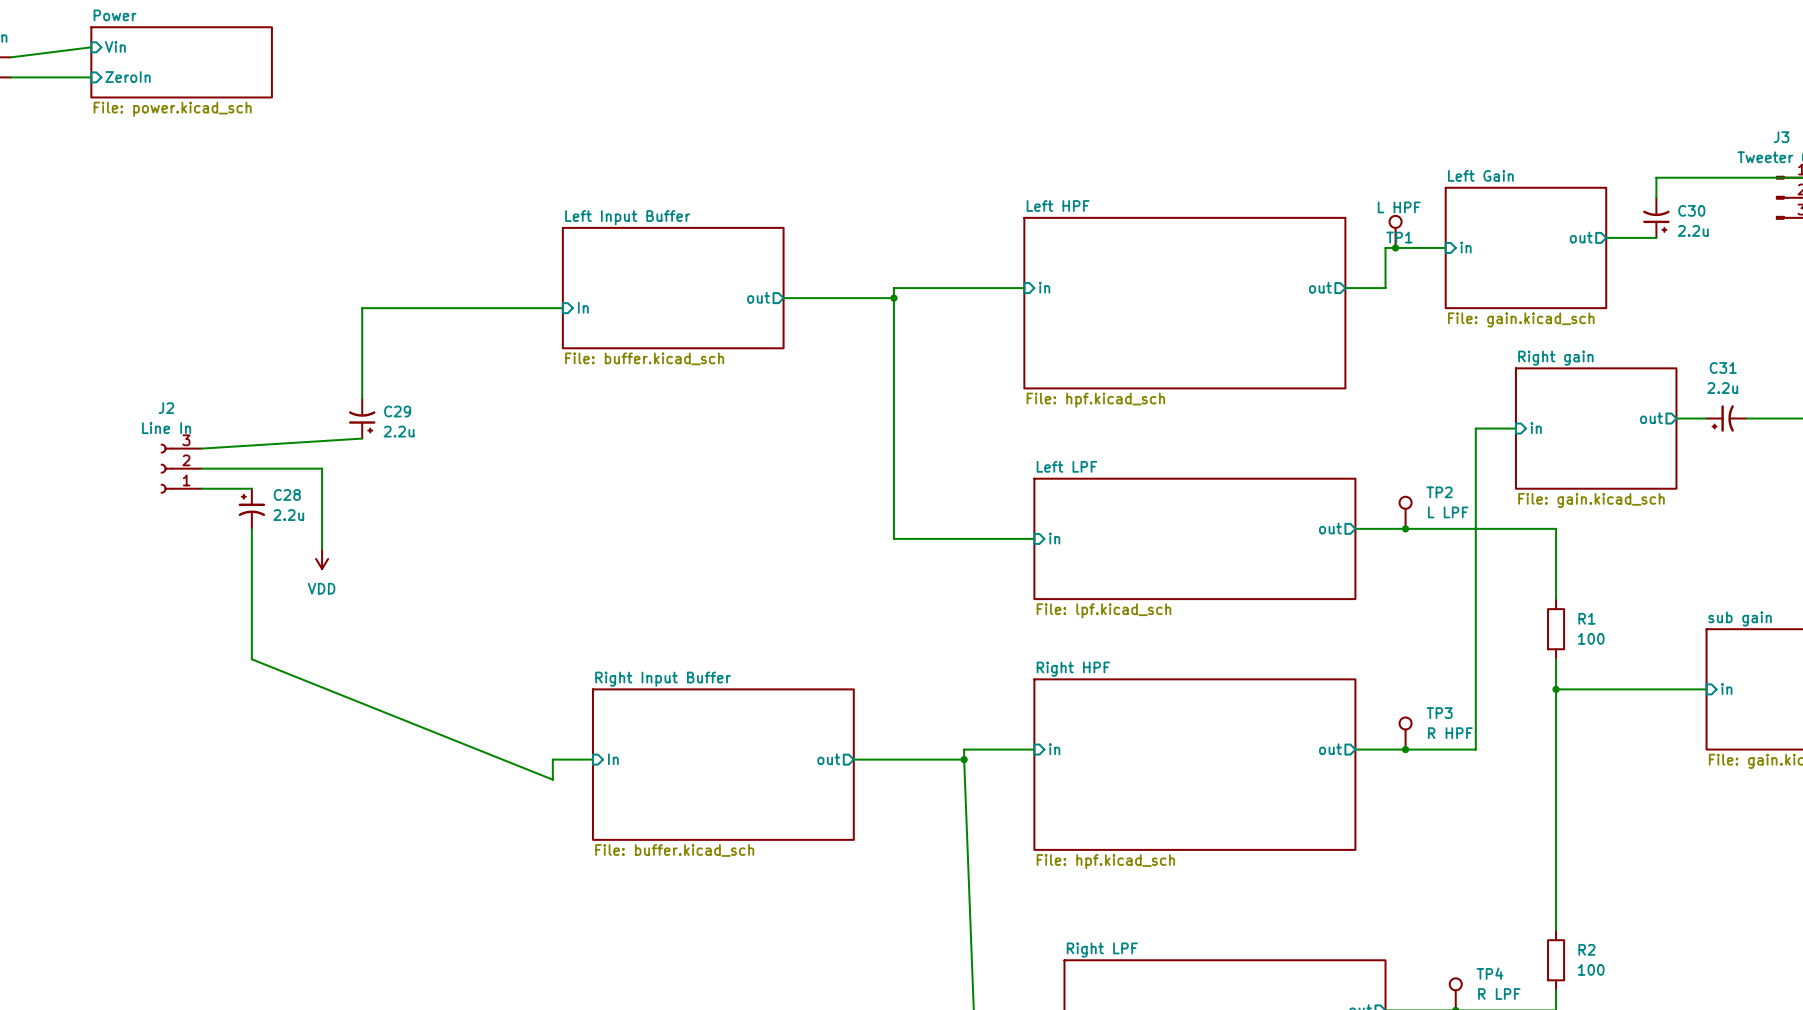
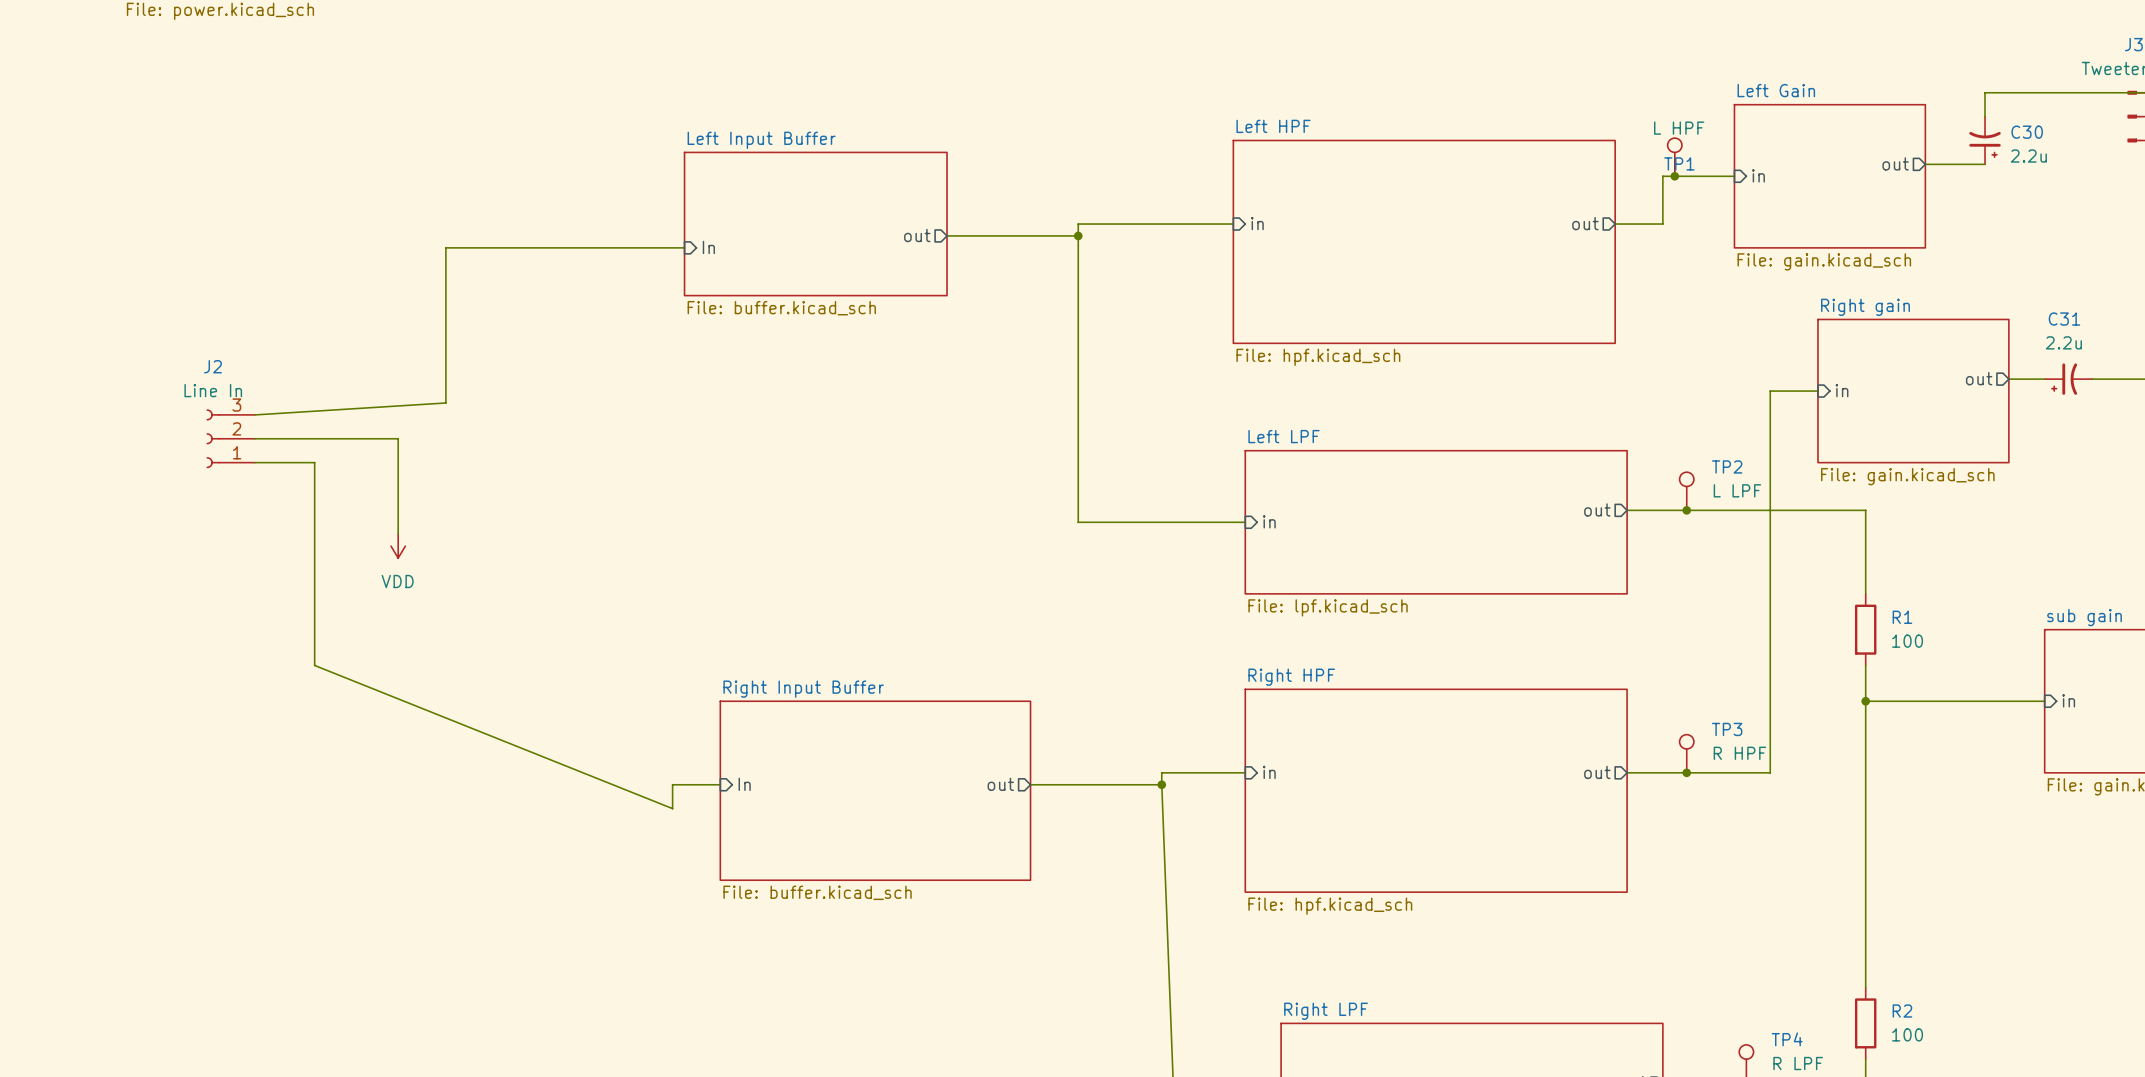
C29: 2.2u (362, 418) -> none
C28: 2.2u (251, 508) -> none

